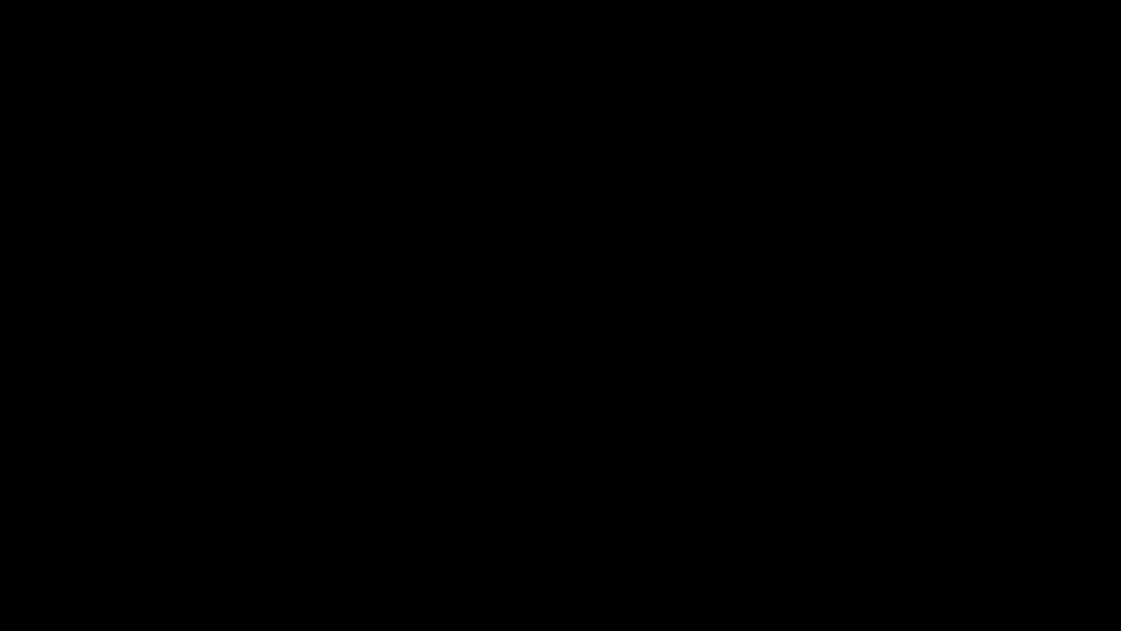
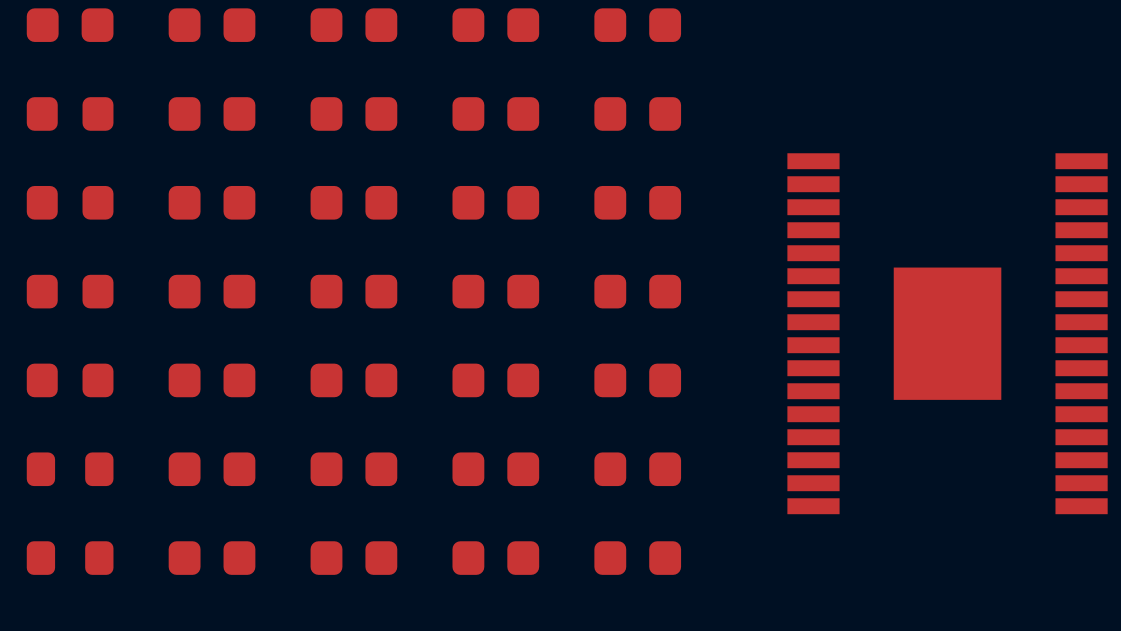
part: none -> (70, 25)
part: none -> (212, 25)
part: none -> (353, 25)
part: none -> (495, 25)
part: none -> (637, 25)
part: none -> (70, 113)
part: none -> (212, 113)
part: none -> (353, 113)
part: none -> (495, 113)
part: none -> (637, 113)
part: none -> (70, 202)
part: none -> (212, 202)
part: none -> (353, 202)
part: none -> (495, 202)
part: none -> (637, 202)
part: none -> (70, 291)
part: none -> (212, 291)
part: none -> (353, 291)
part: none -> (495, 291)
part: none -> (637, 291)
part: none -> (947, 333)
part: none -> (70, 380)
part: none -> (212, 380)
part: none -> (353, 380)
part: none -> (495, 380)
part: none -> (637, 380)
part: none -> (70, 469)
part: none -> (212, 469)
part: none -> (353, 469)
part: none -> (495, 469)
part: none -> (637, 469)
part: none -> (70, 558)
part: none -> (212, 558)
part: none -> (353, 558)
part: none -> (495, 558)
part: none -> (637, 558)

